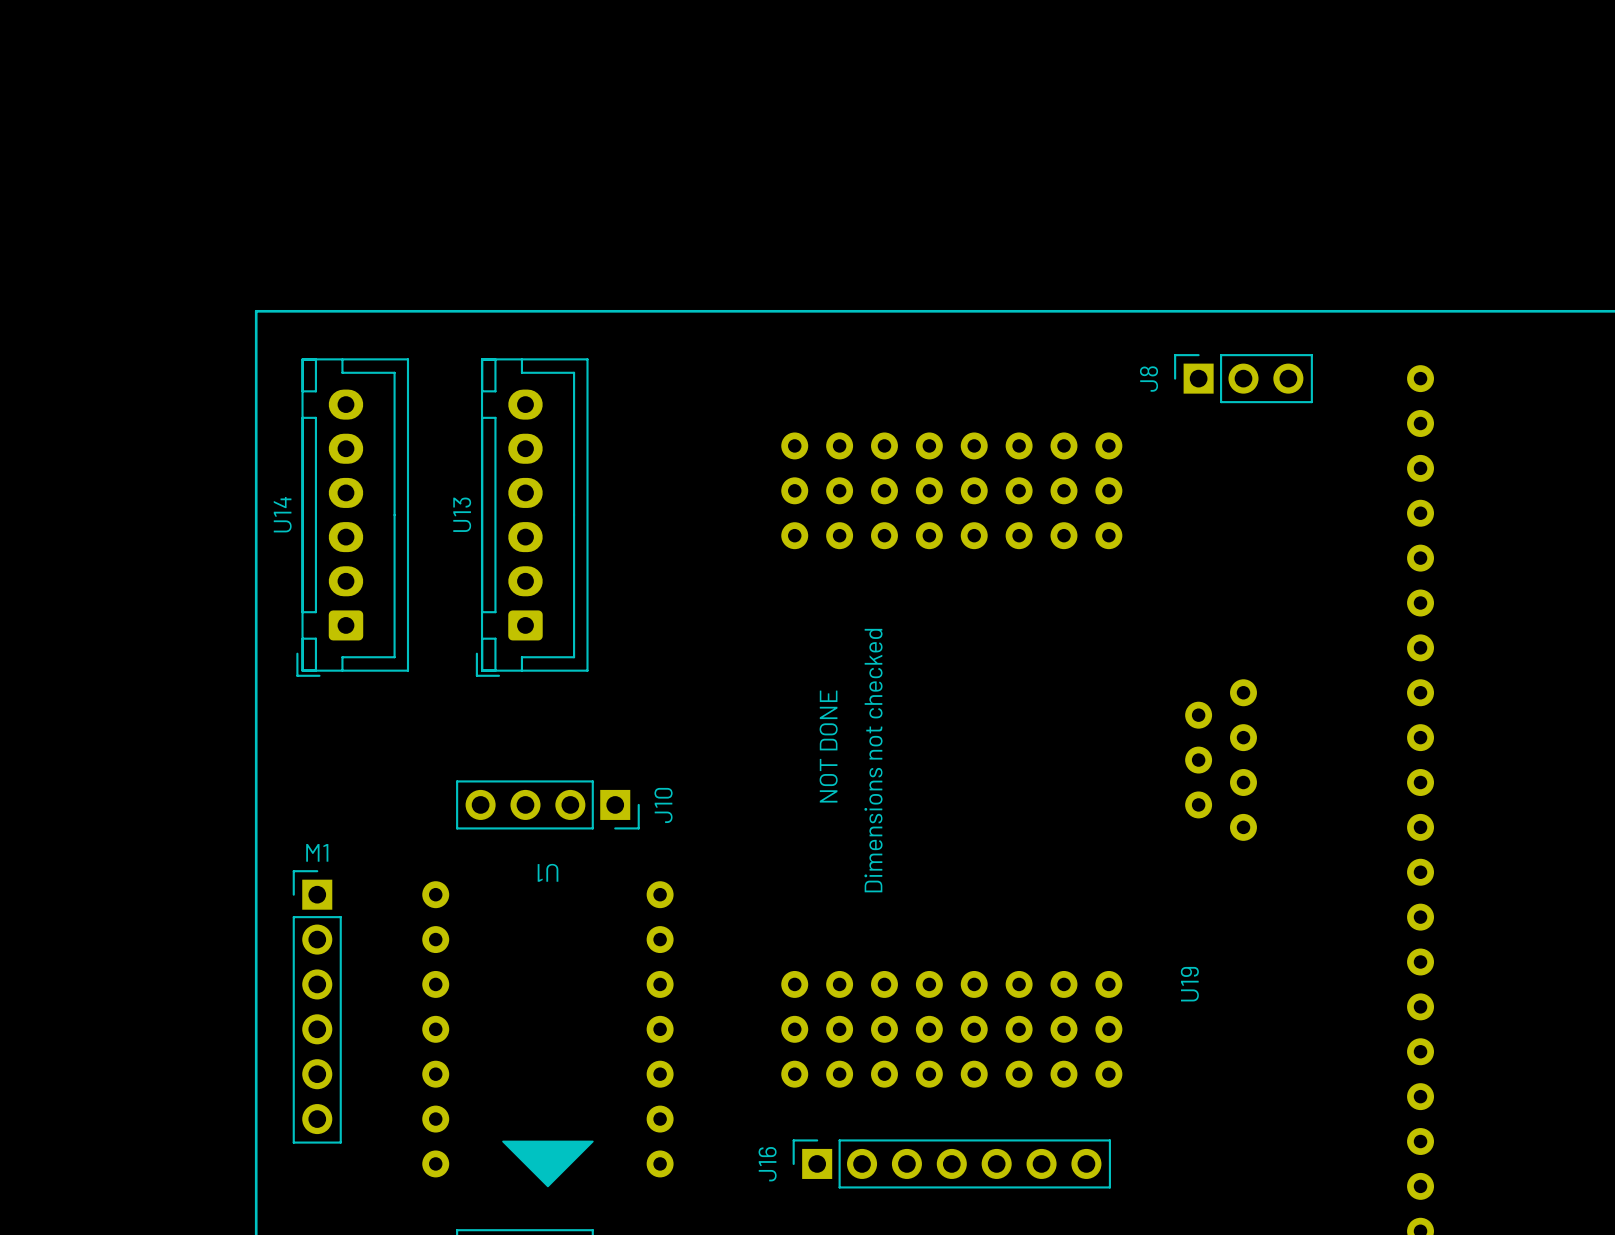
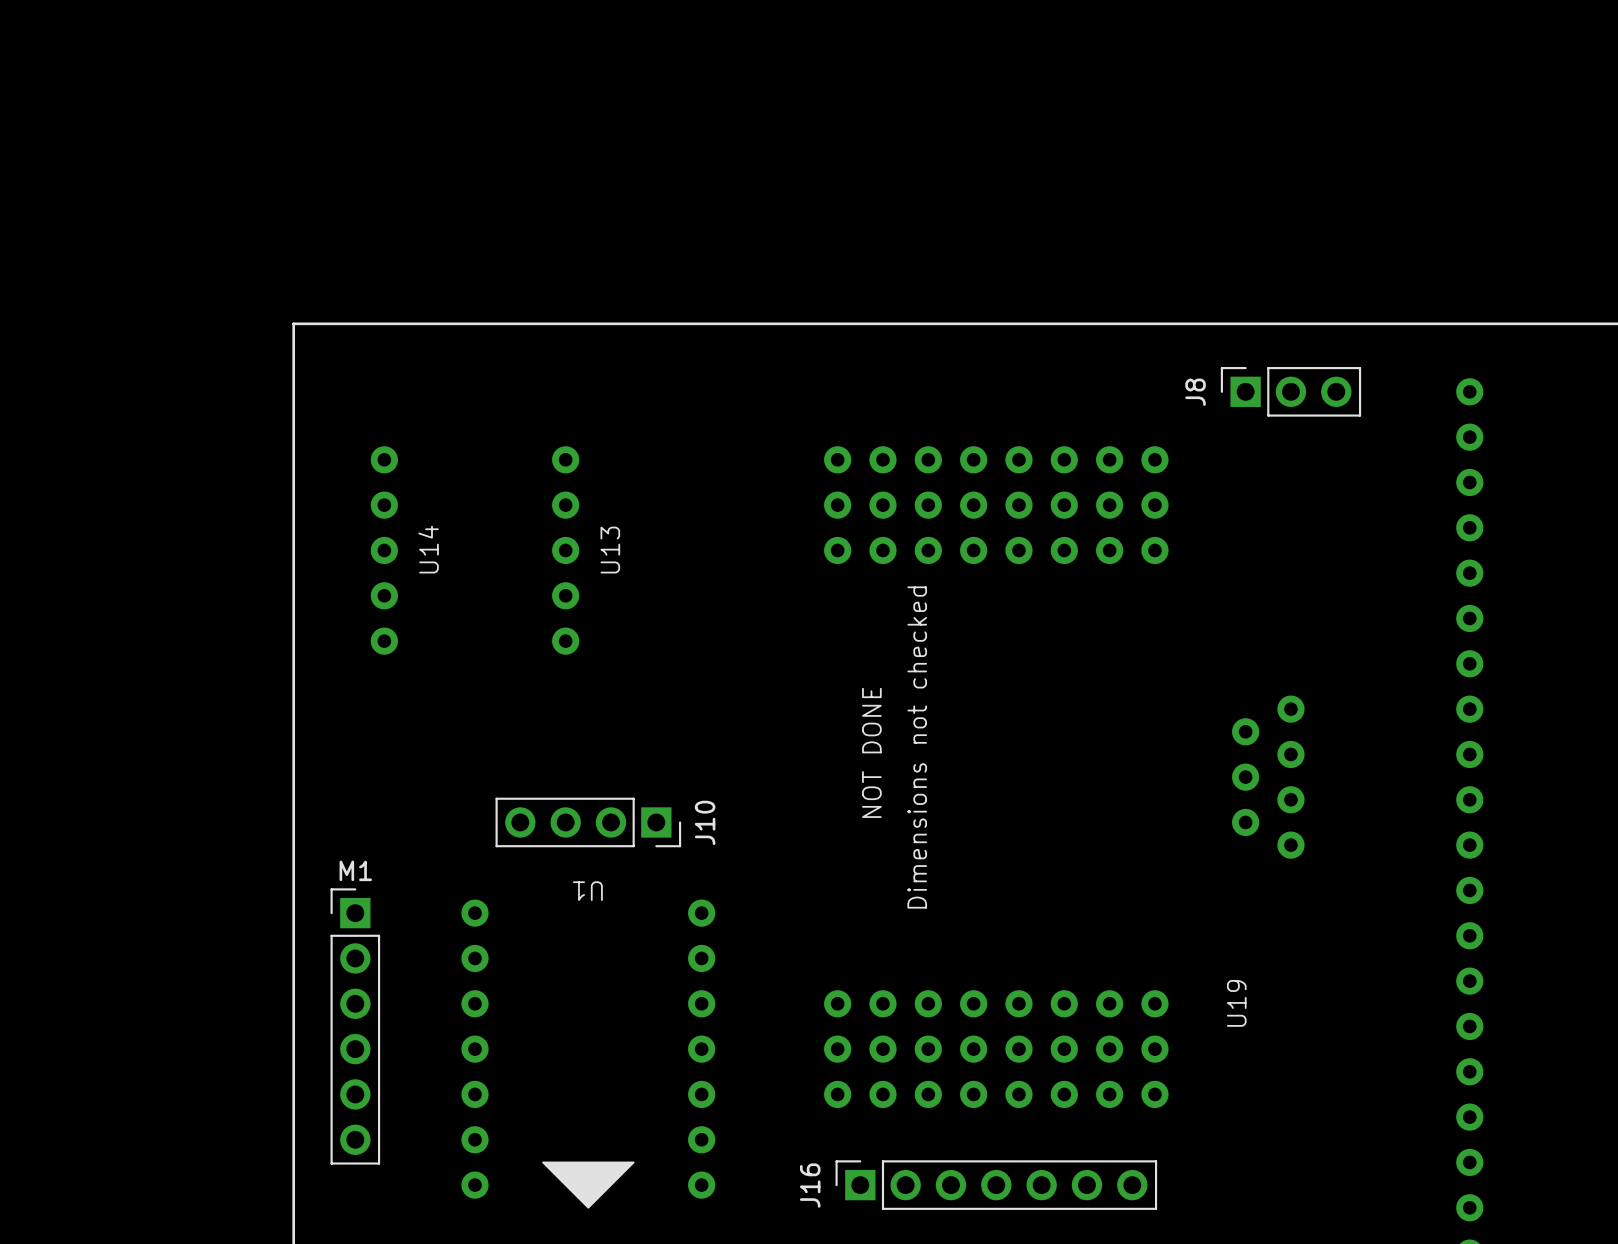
U14 footprint: [296, 358, 410, 677] -> [370, 446, 398, 655]
U13 footprint: [475, 358, 589, 677] -> [552, 446, 580, 655]
U14 name position: U14 (282, 514) -> U14 (428, 549)
U13 name position: U13 (462, 514) -> U13 (610, 550)

